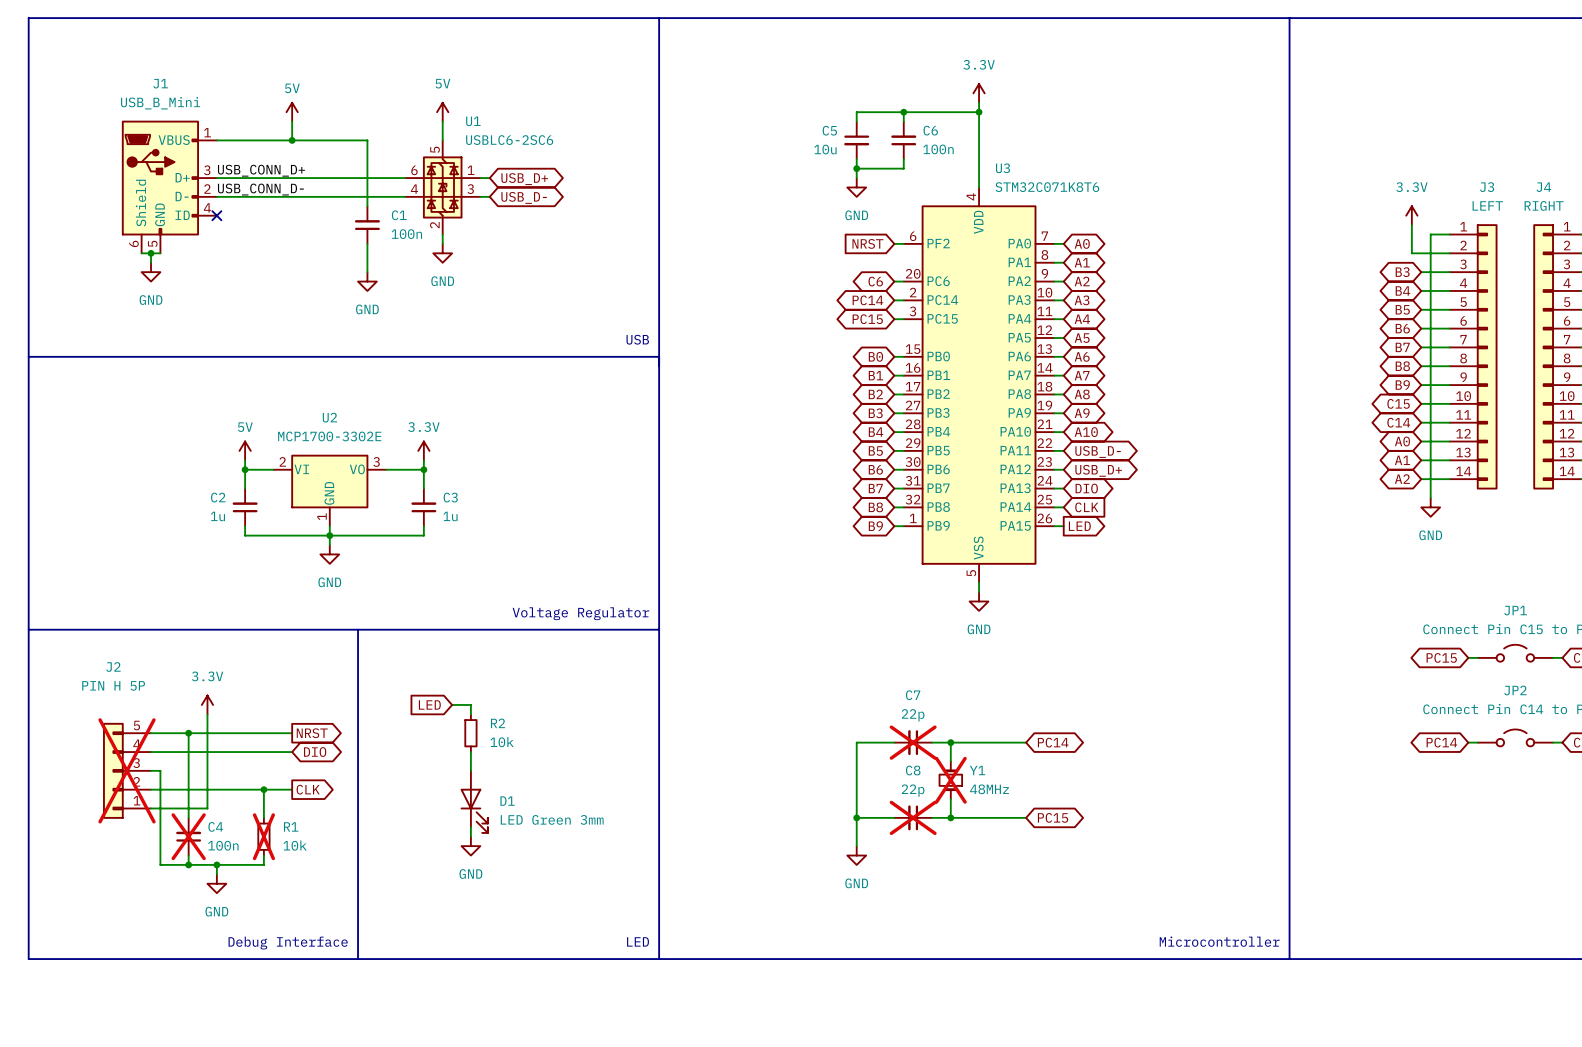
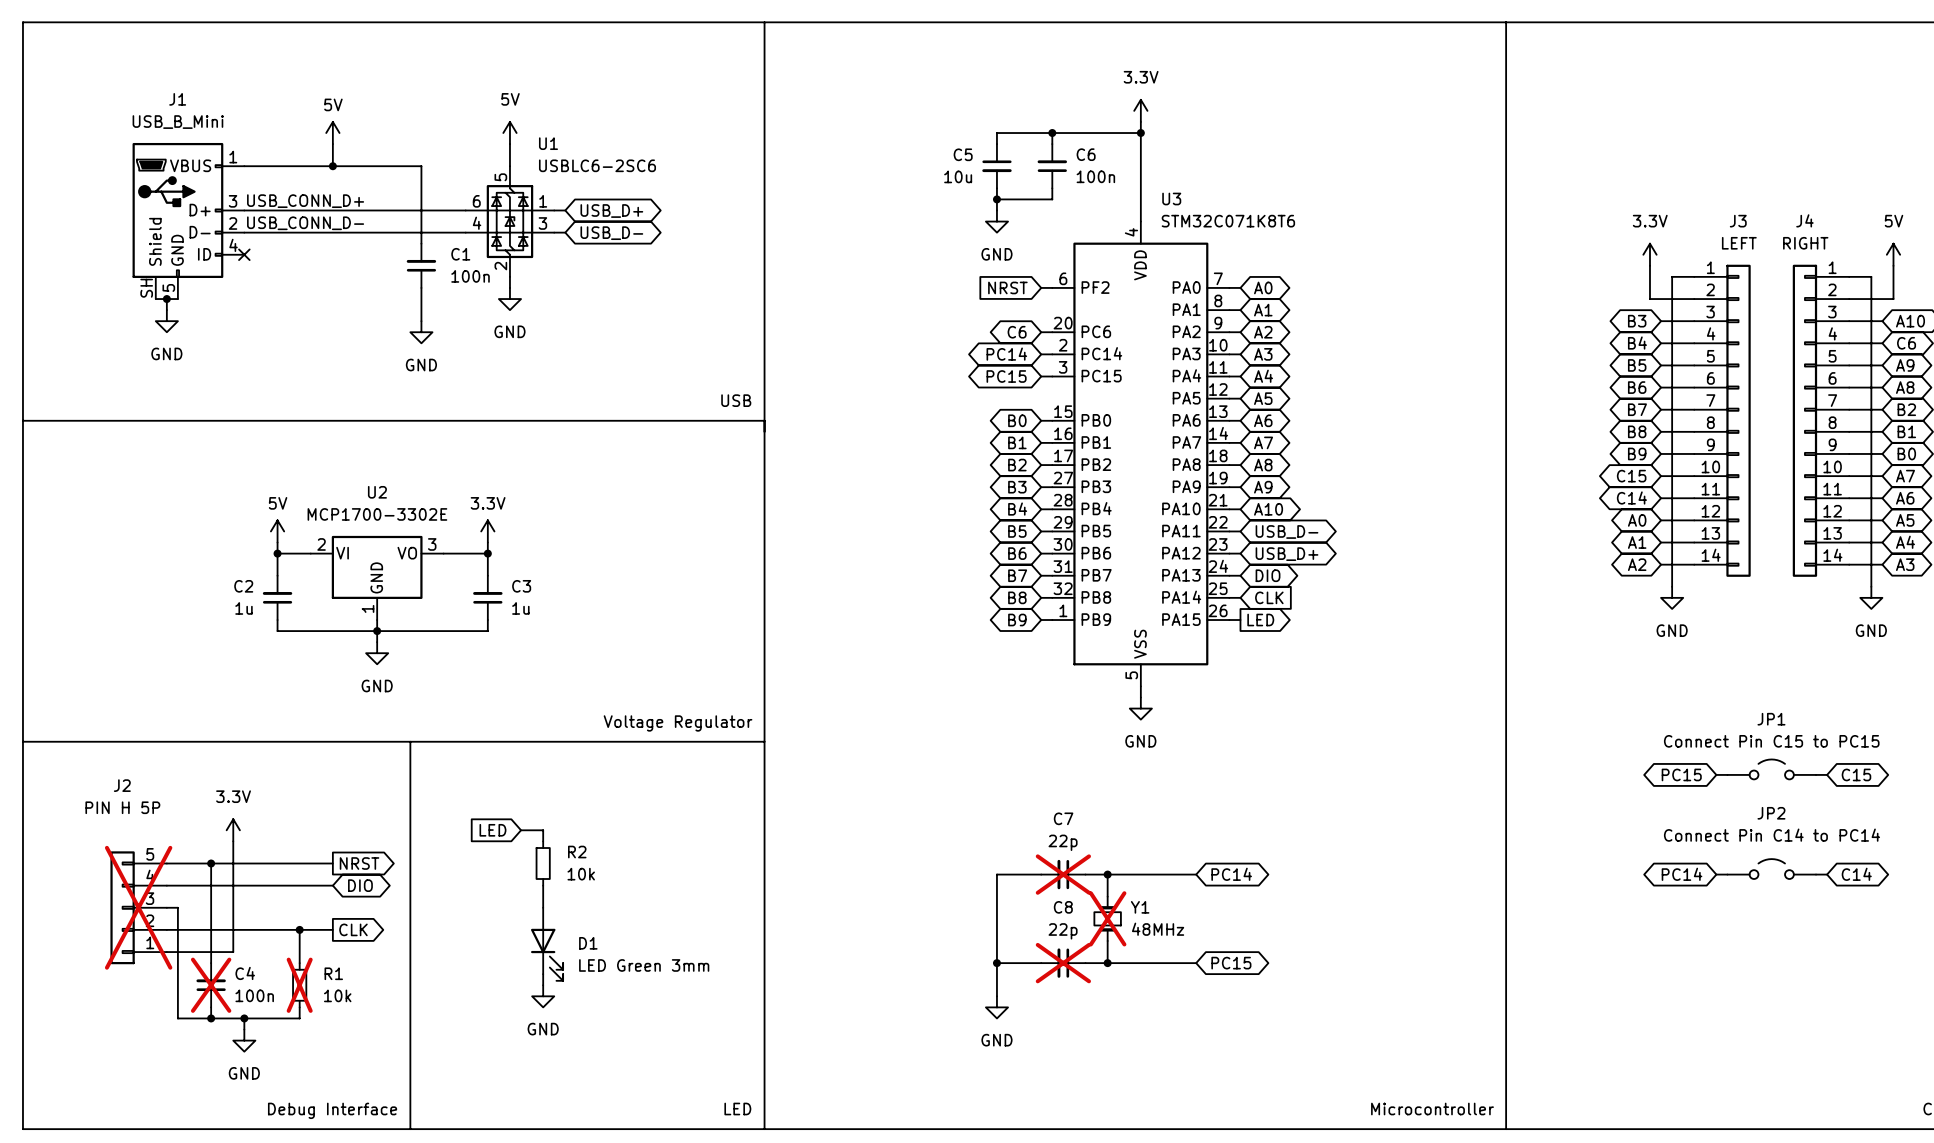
J1 pin number: 6 (133, 243) -> SH (146, 288)

